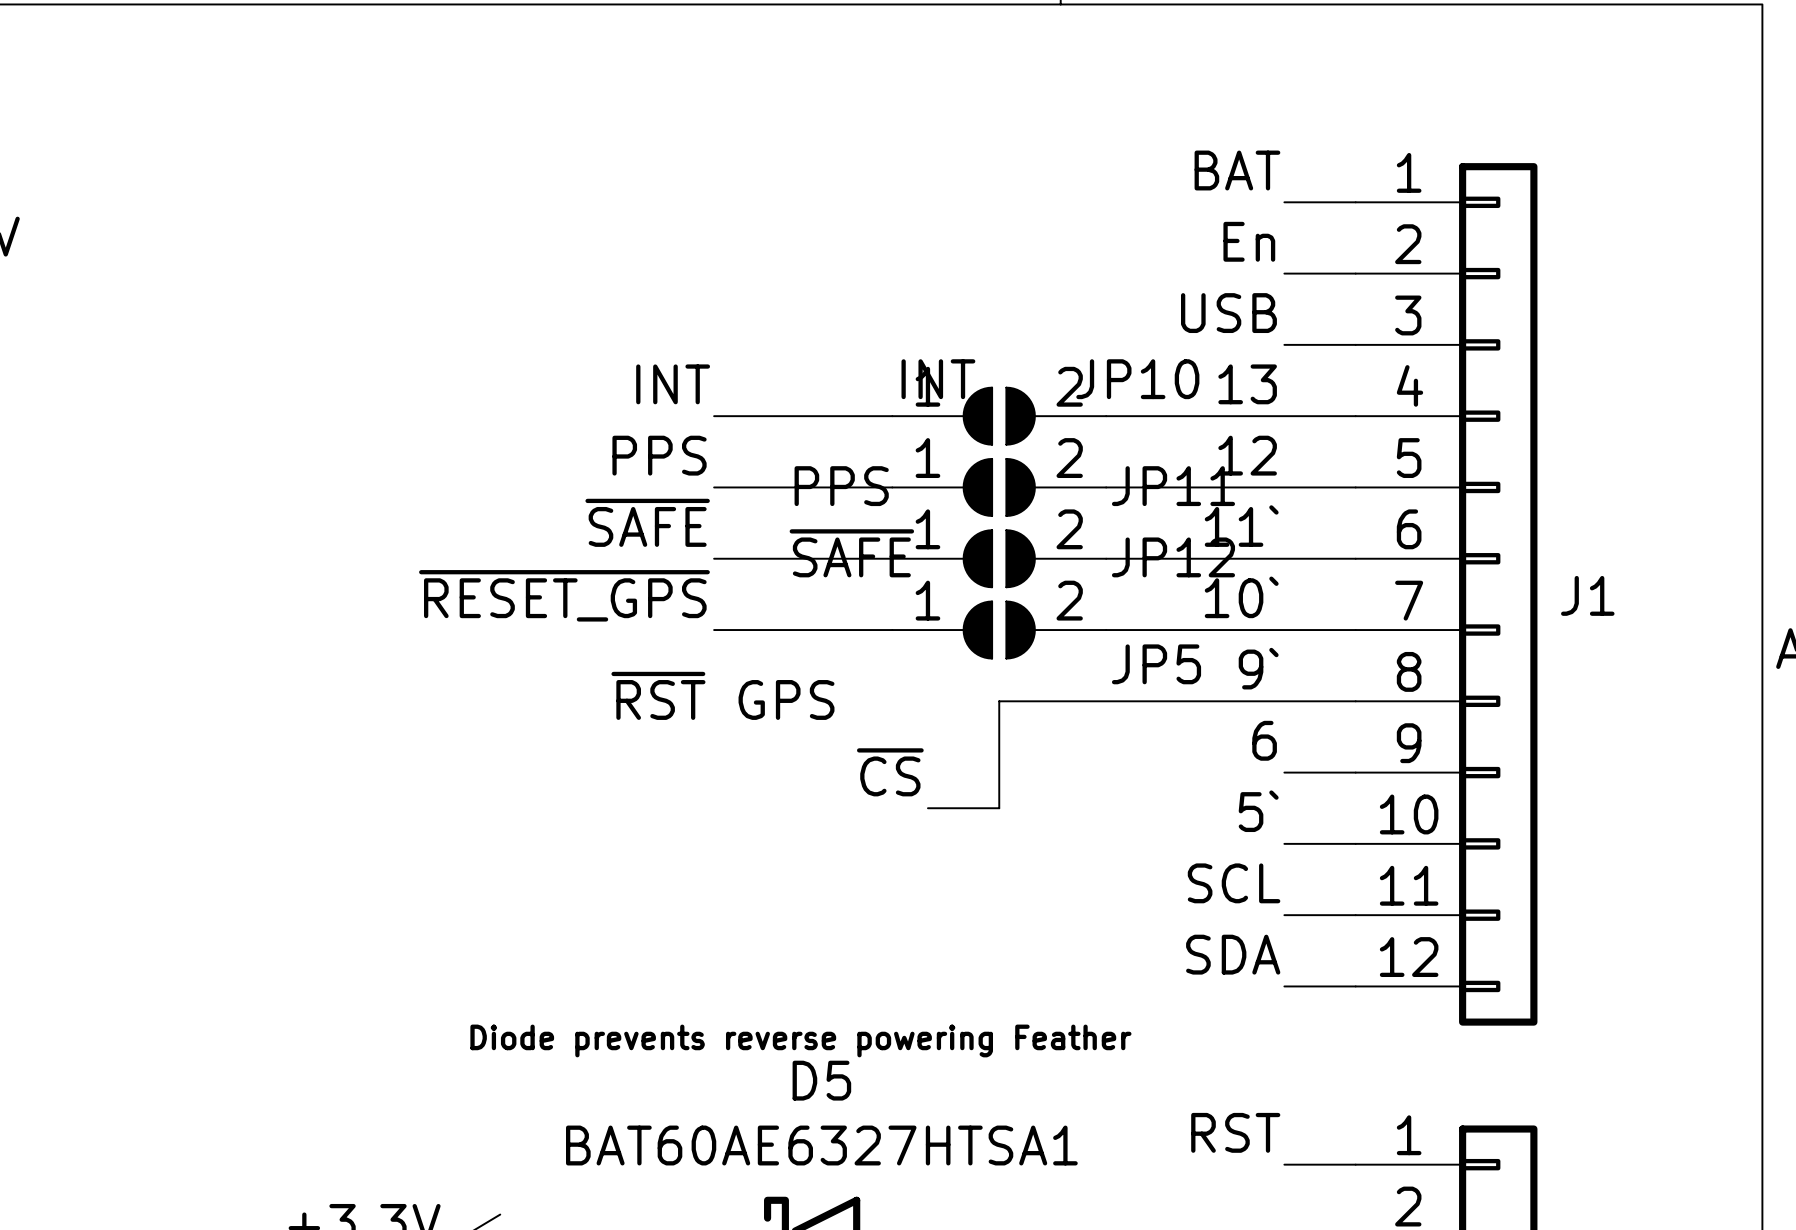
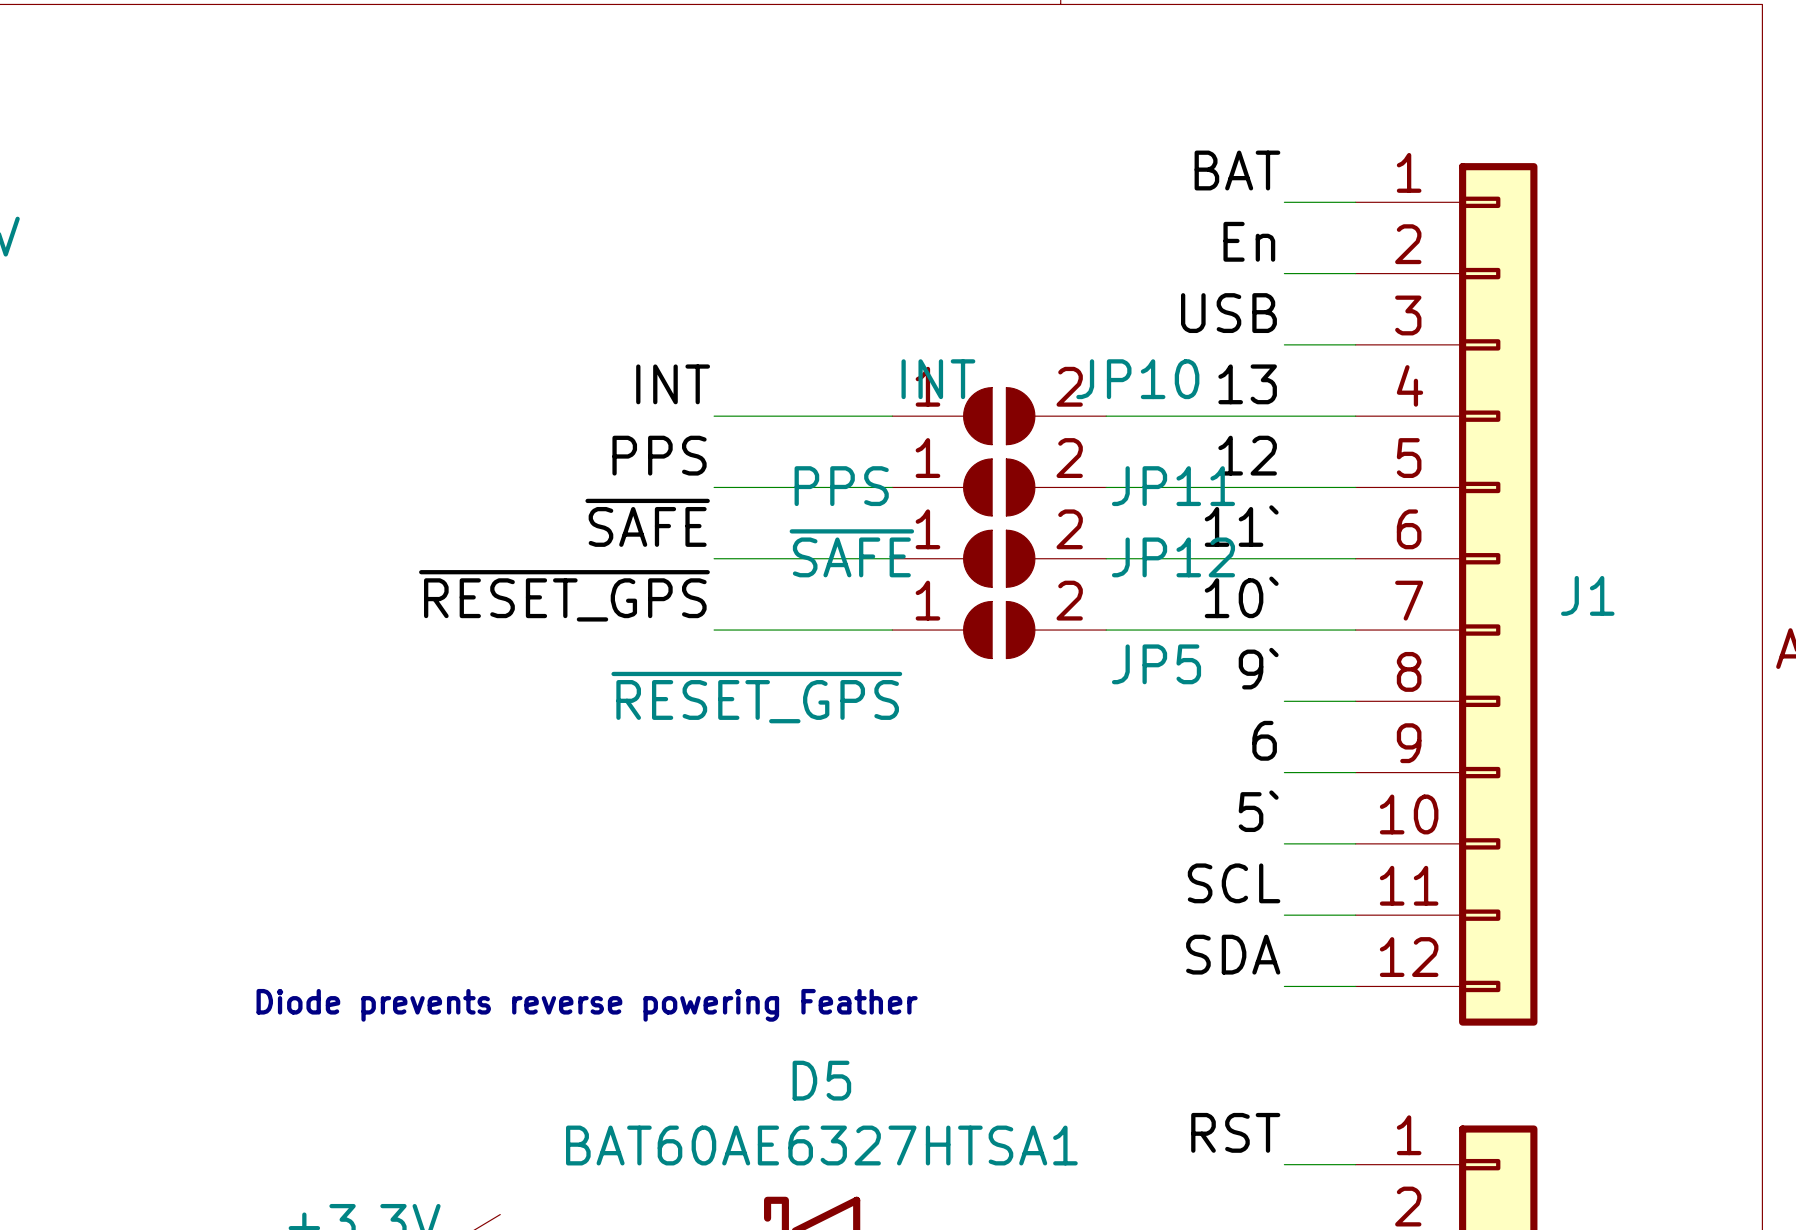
JP5 value: ~{RST} GPS (722, 695) -> ~{RESET_GPS} (756, 697)
wire: (1284, 701) (999, 701) (999, 808) (927, 808) -> none
label: ~{CS} (890, 772) -> none
text position: Diode prevents reverse powering Feather (800, 1040) -> Diode prevents reverse powering Feather (587, 1005)

